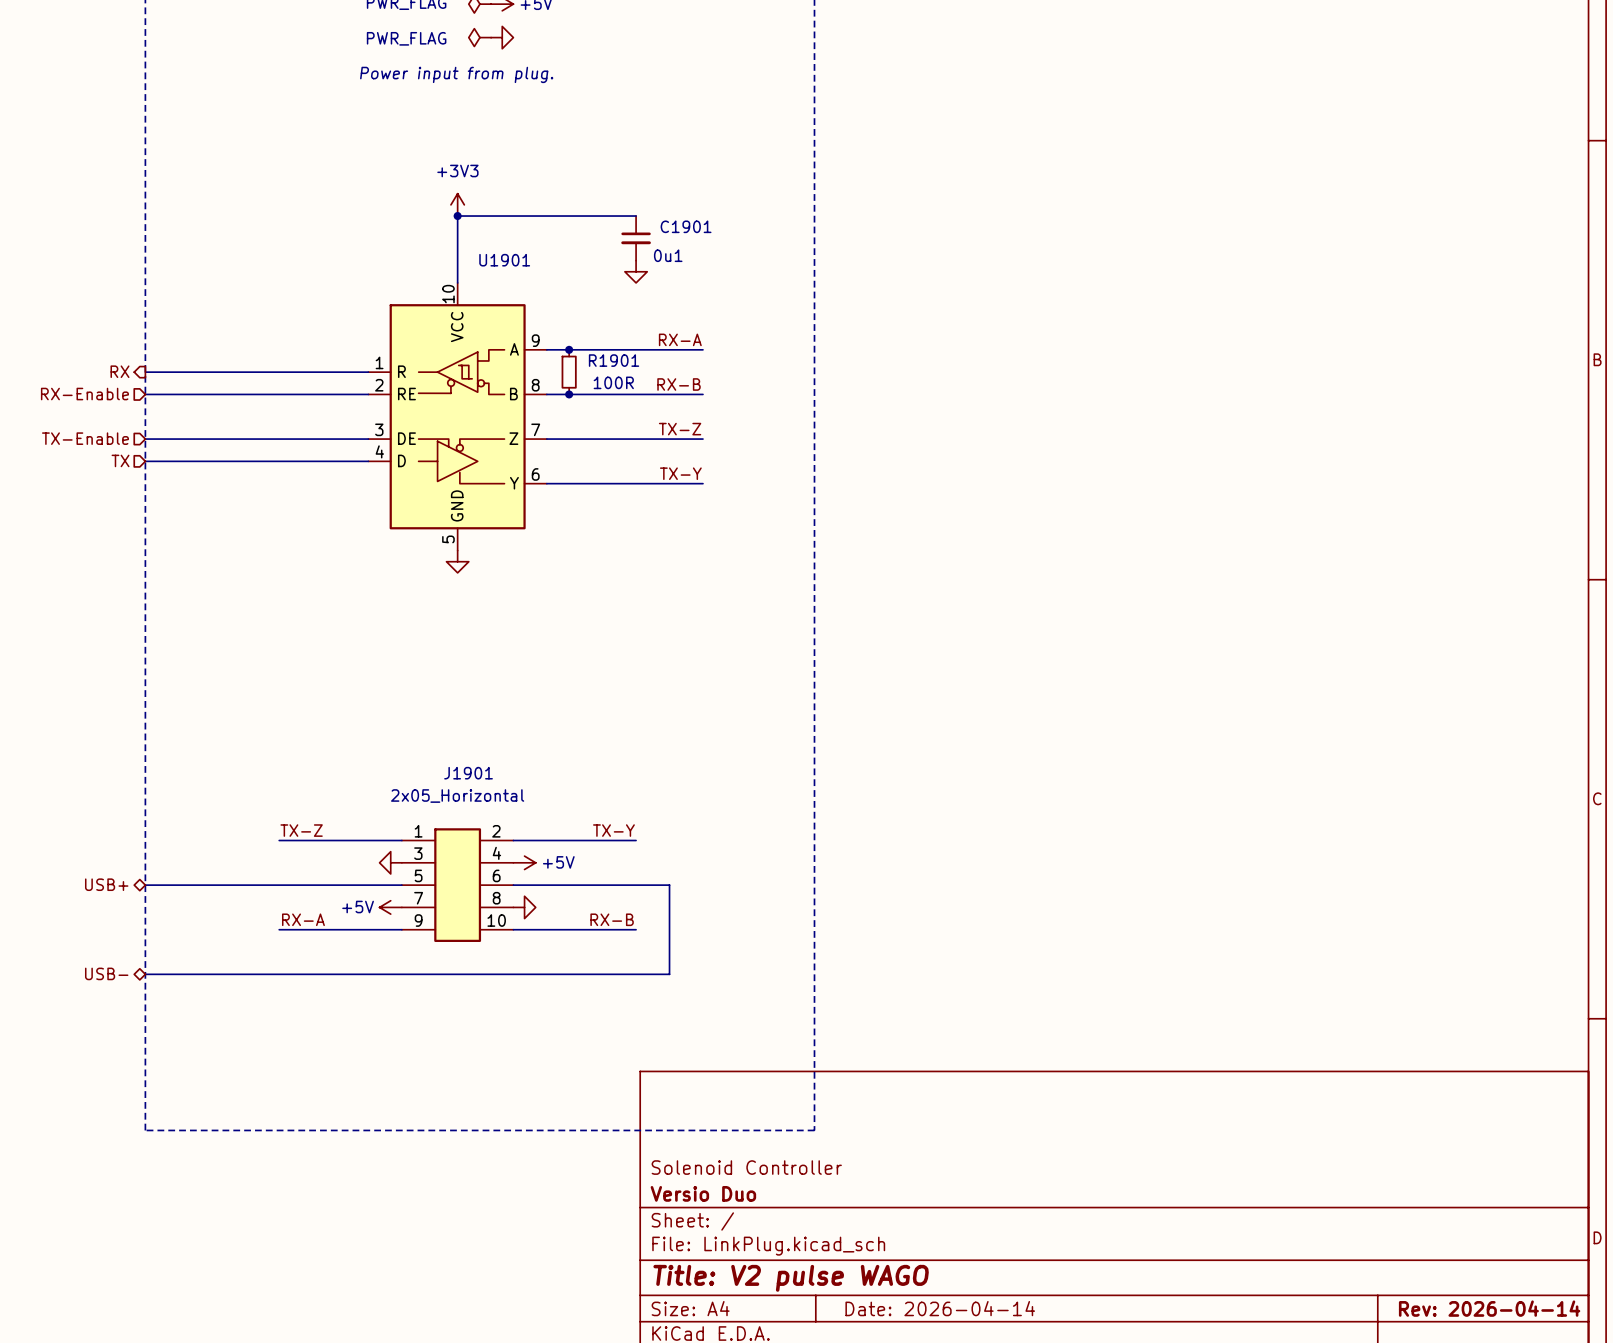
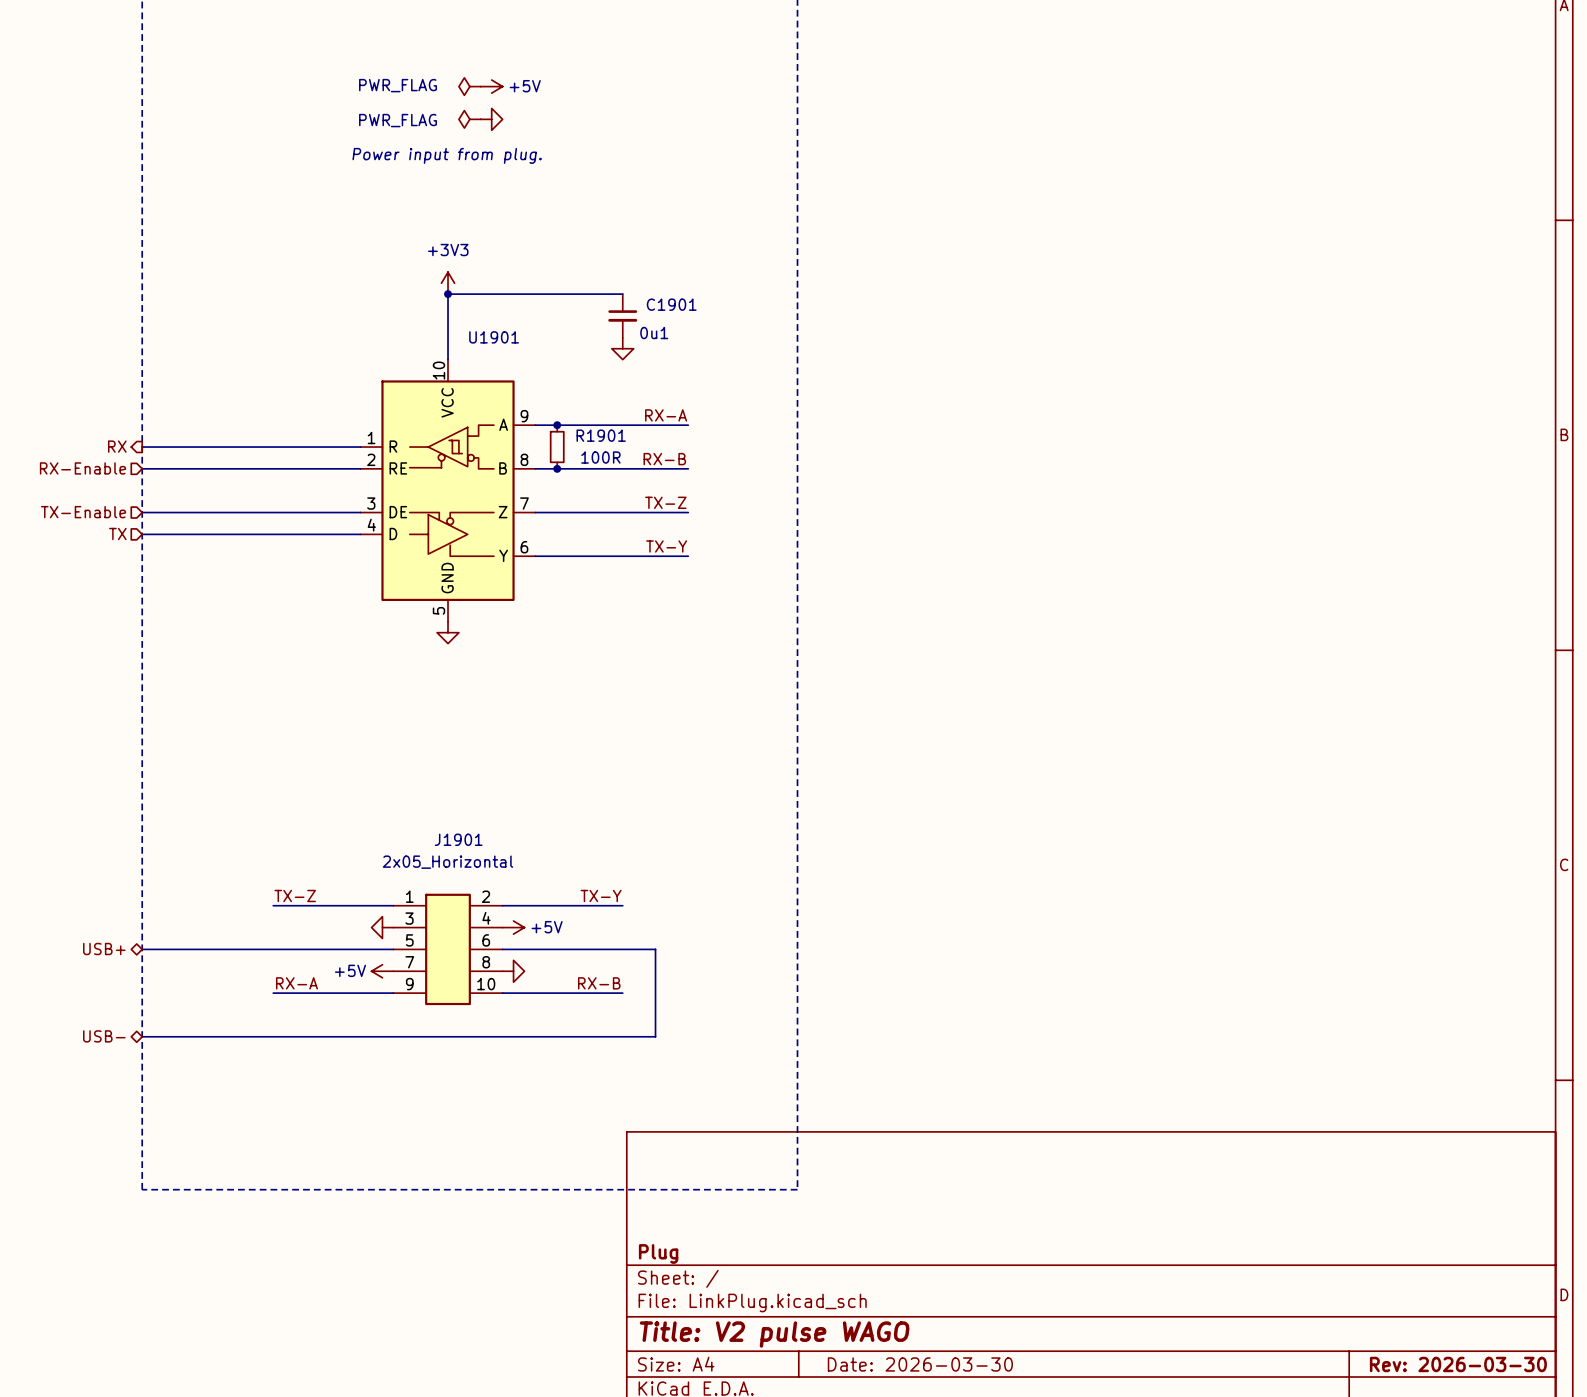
title block: Solenoid Controller (746, 1167) -> none
title block: Versio Duo (703, 1193) -> Plug (658, 1253)
title block: Date: 2026-04-14 (940, 1308) -> Date: 2026-03-30 (920, 1364)
title block: Rev: 2026-04-14 (1489, 1308) -> Rev: 2026-03-30 (1458, 1364)

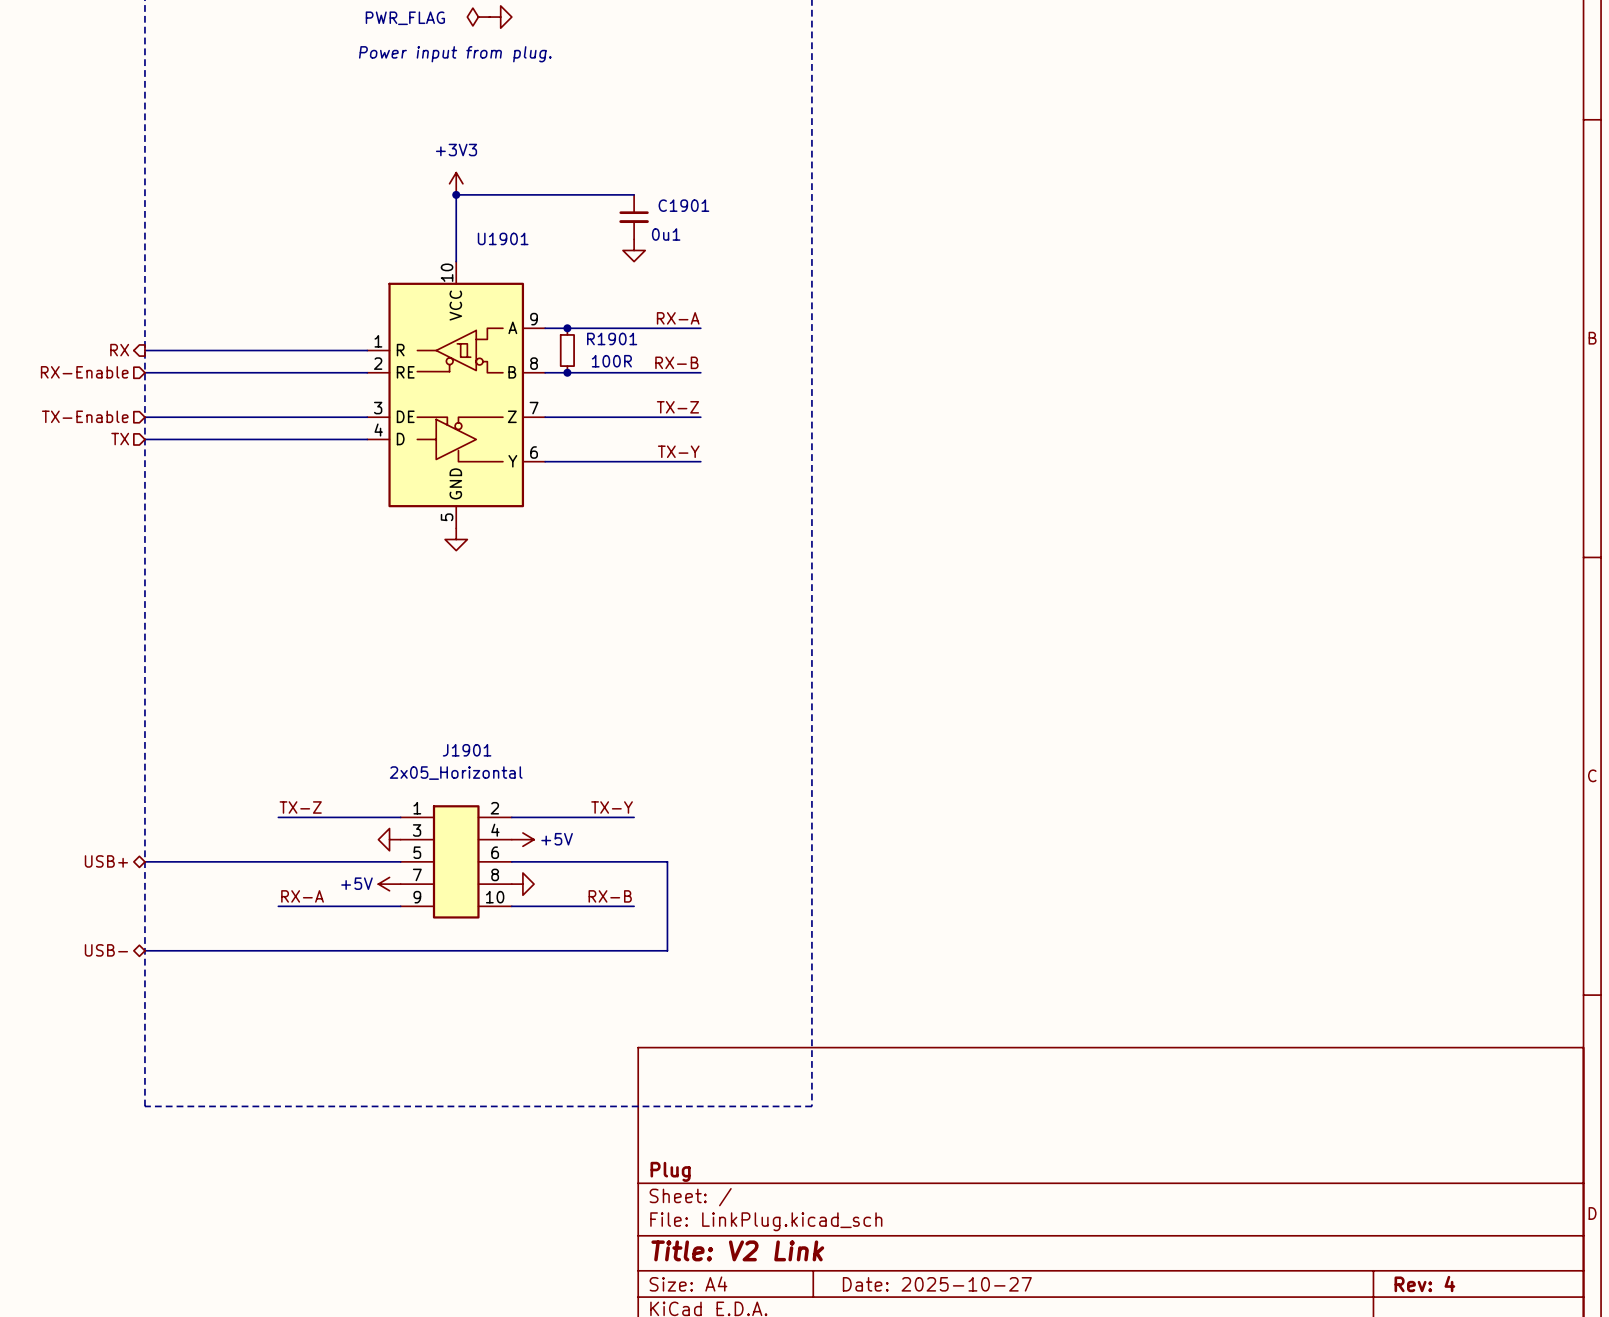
title block: Title: V2 pulse WAGO (774, 1334) -> Title: V2 Link (737, 1250)
title block: Date: 2026-03-30 (920, 1364) -> Date: 2025-10-27 (937, 1284)
title block: Rev: 2026-03-30 (1458, 1364) -> Rev: 4 (1424, 1284)

